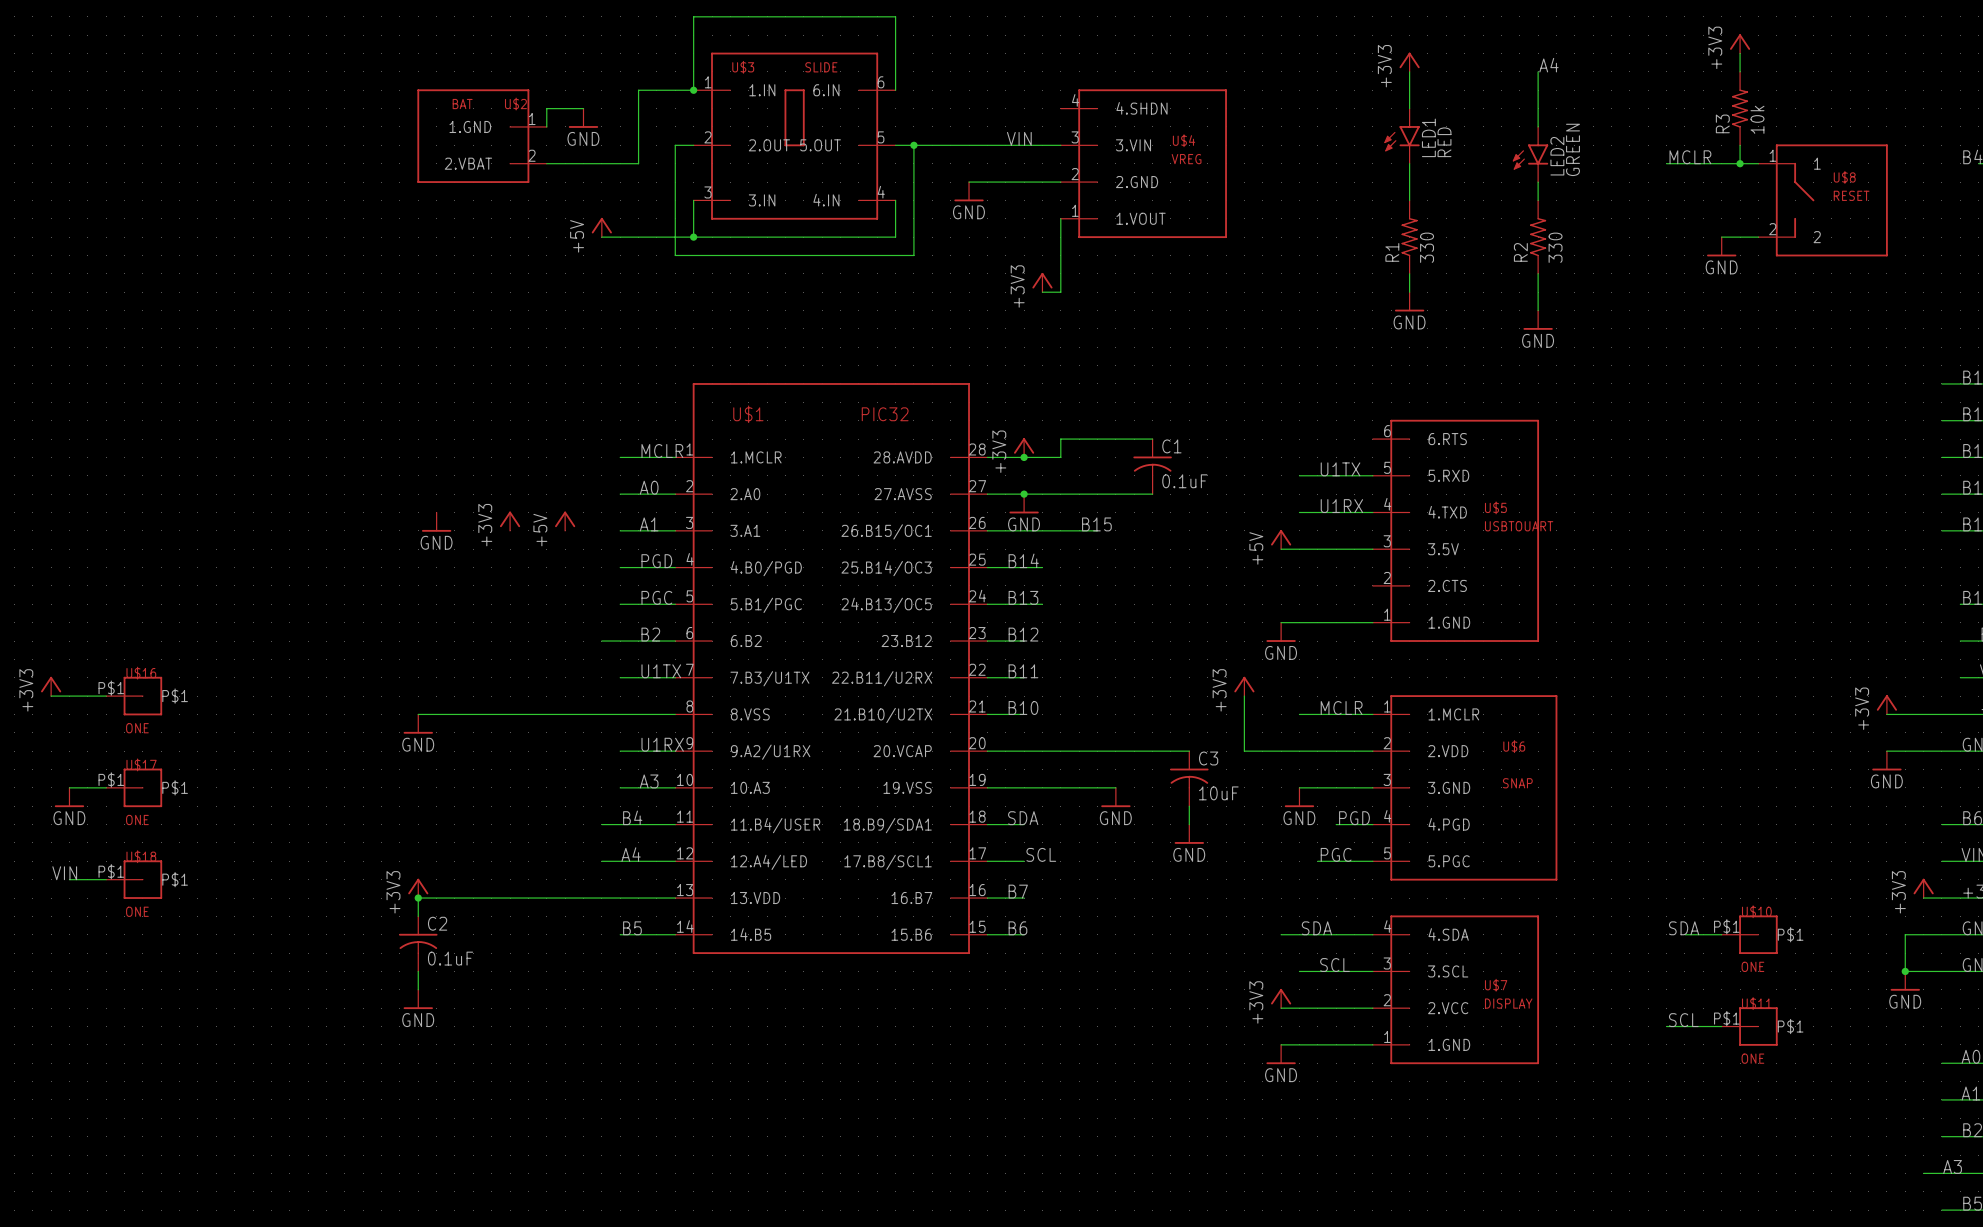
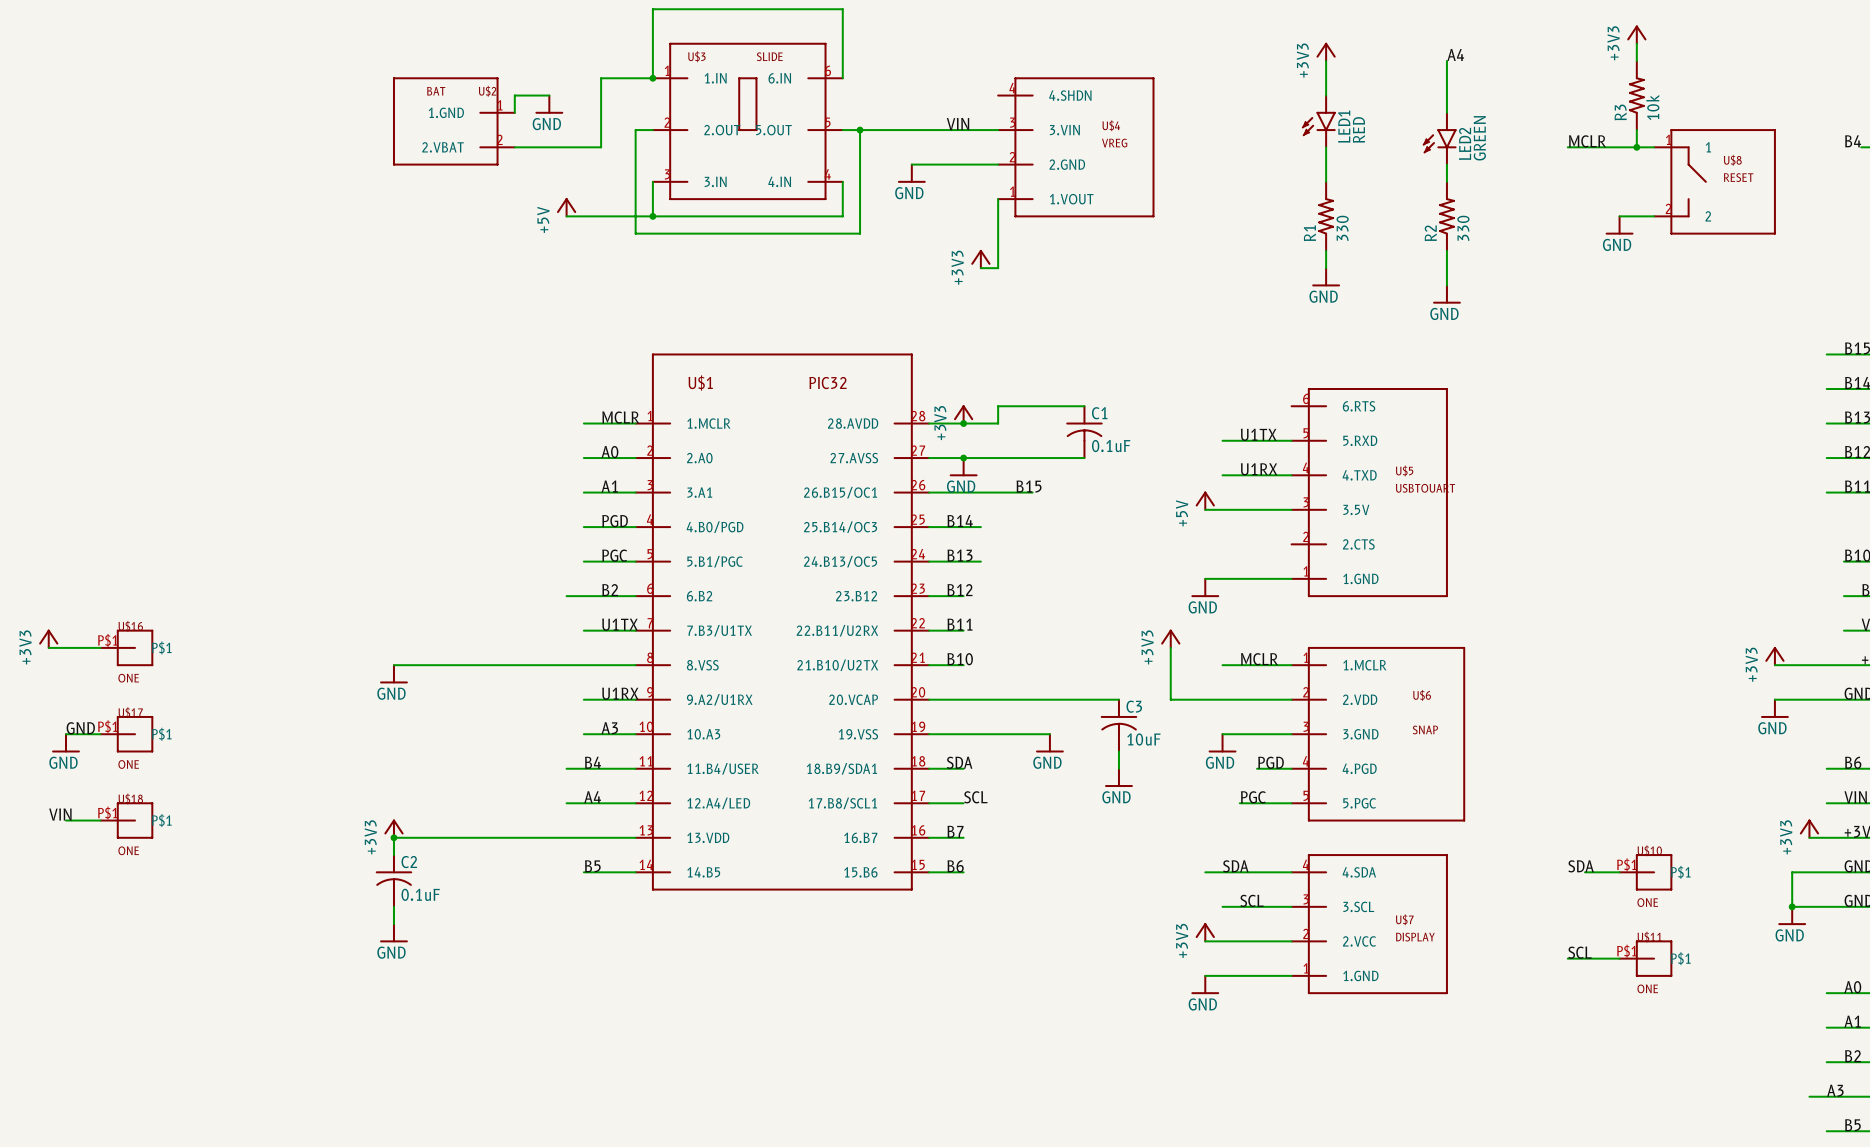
power symbol: +3V3 (510, 521) -> none
power symbol: +5V (565, 521) -> none
power symbol: GND (436, 522) -> none
label: none -> GND (80, 728)

